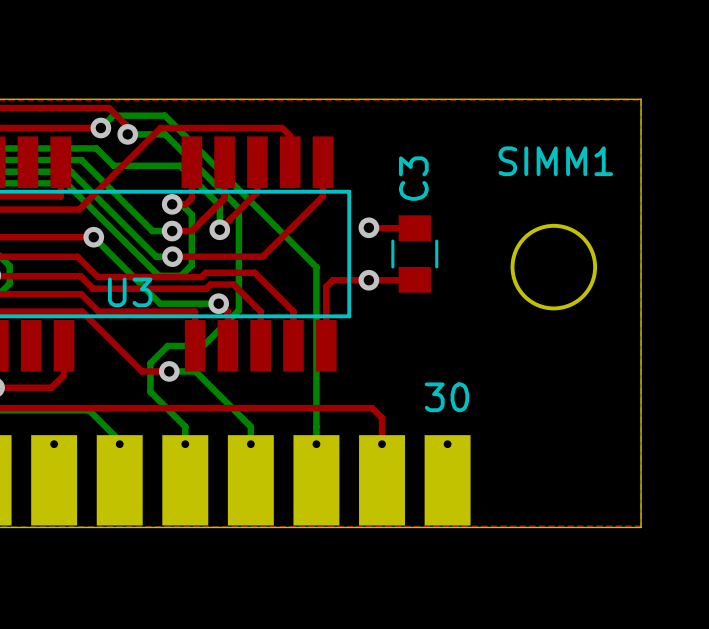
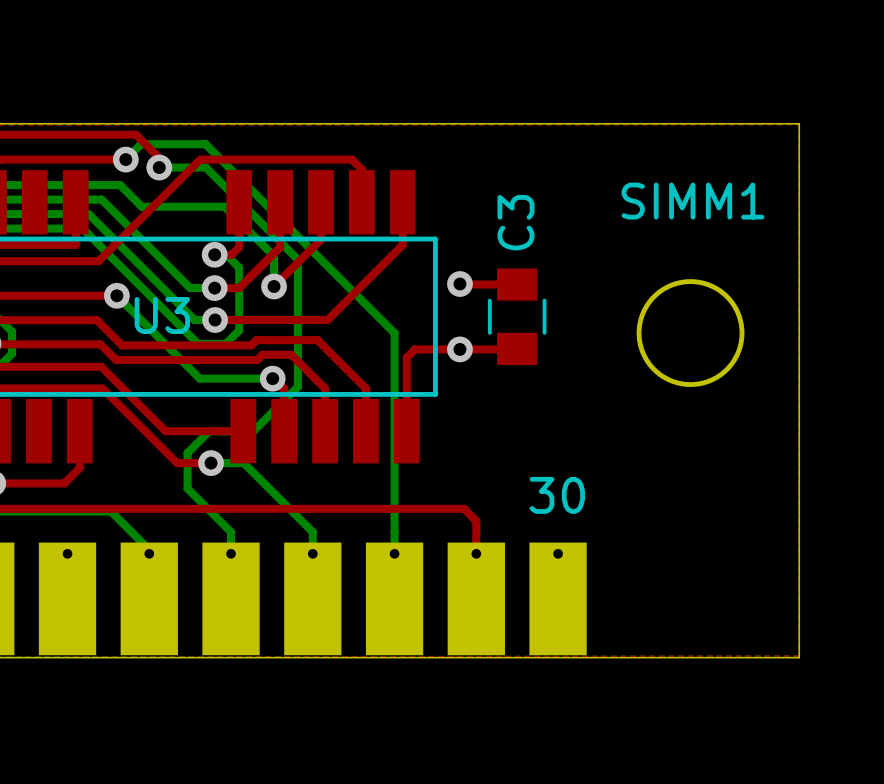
U3 name position: U3 (130, 292) -> U3 (162, 315)
top track: (98, 311) (195, 311) (195, 345) -> (122, 388) (165, 431) (243, 431)

